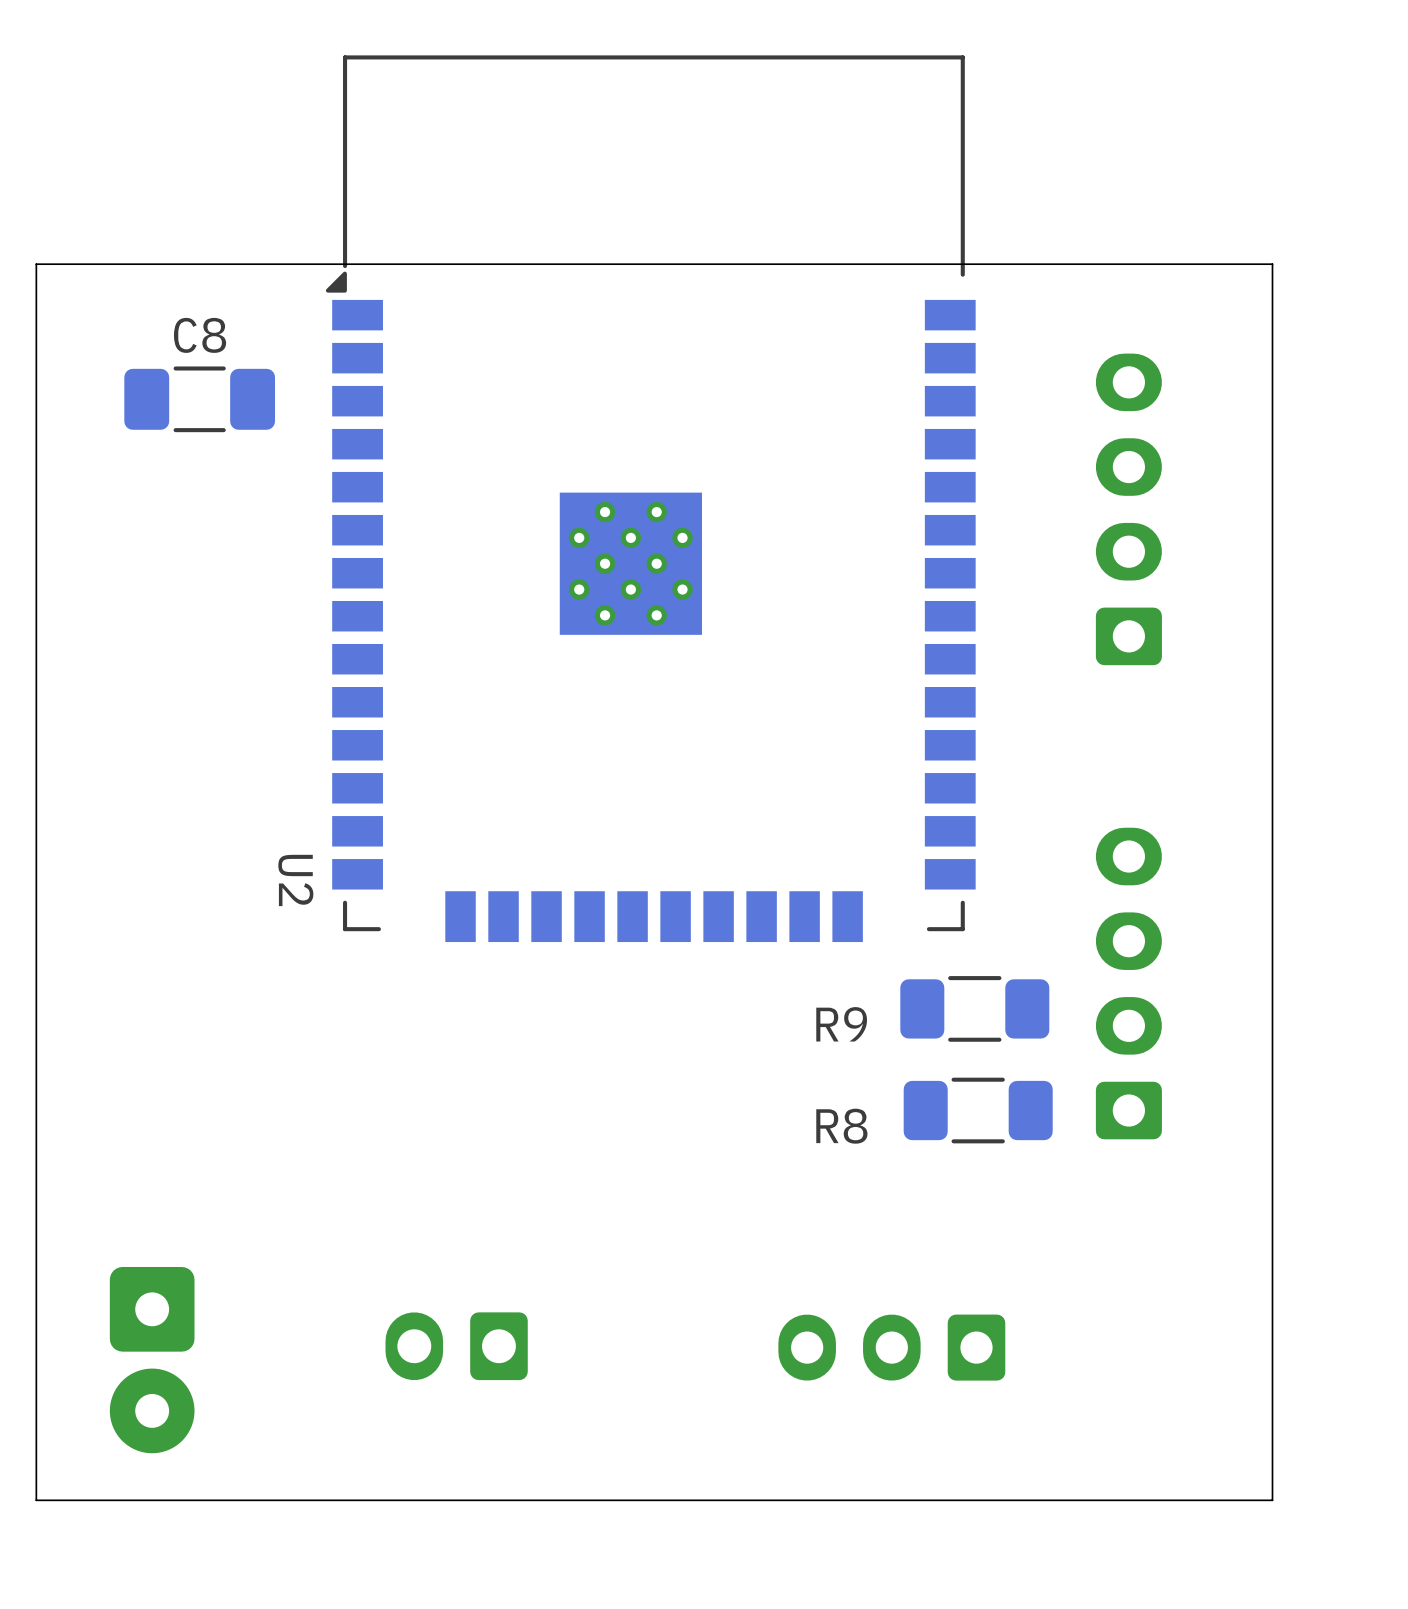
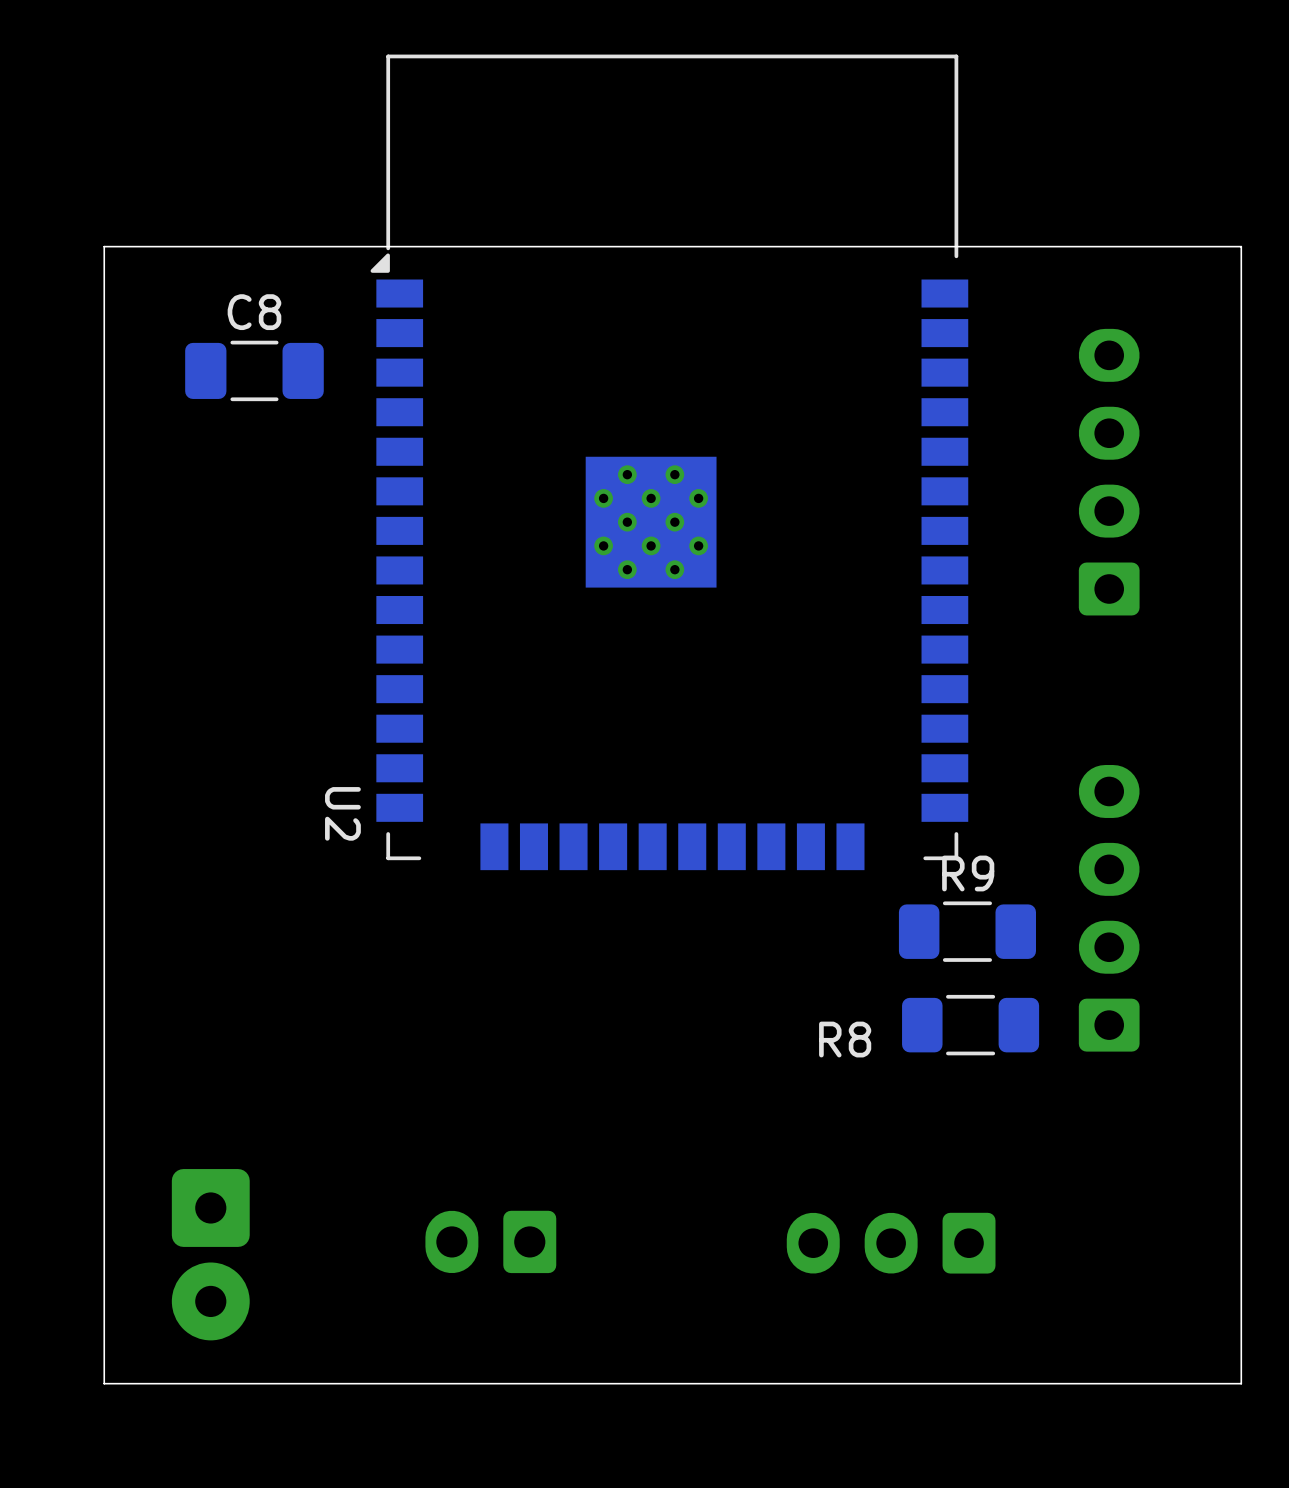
R9 name position: R9 (841, 1024) -> R9 (968, 873)

